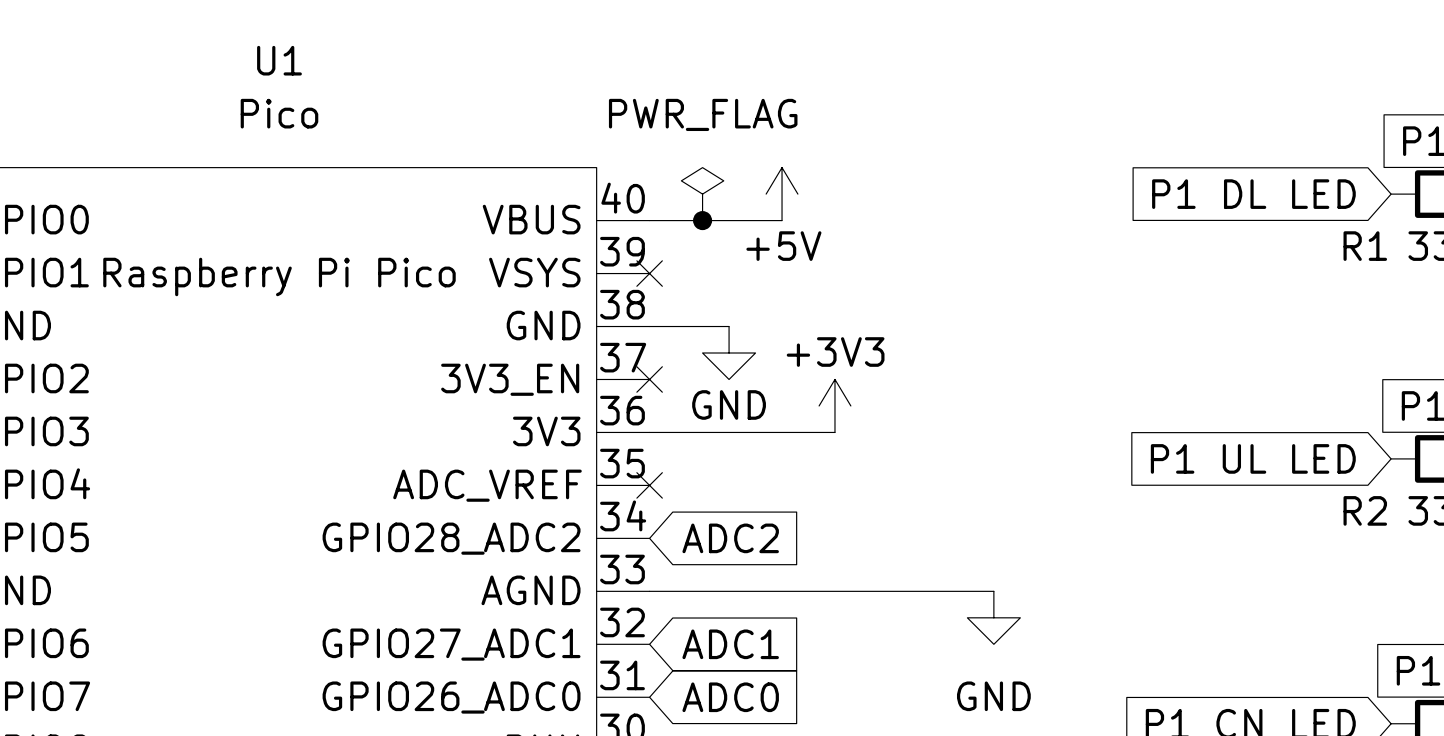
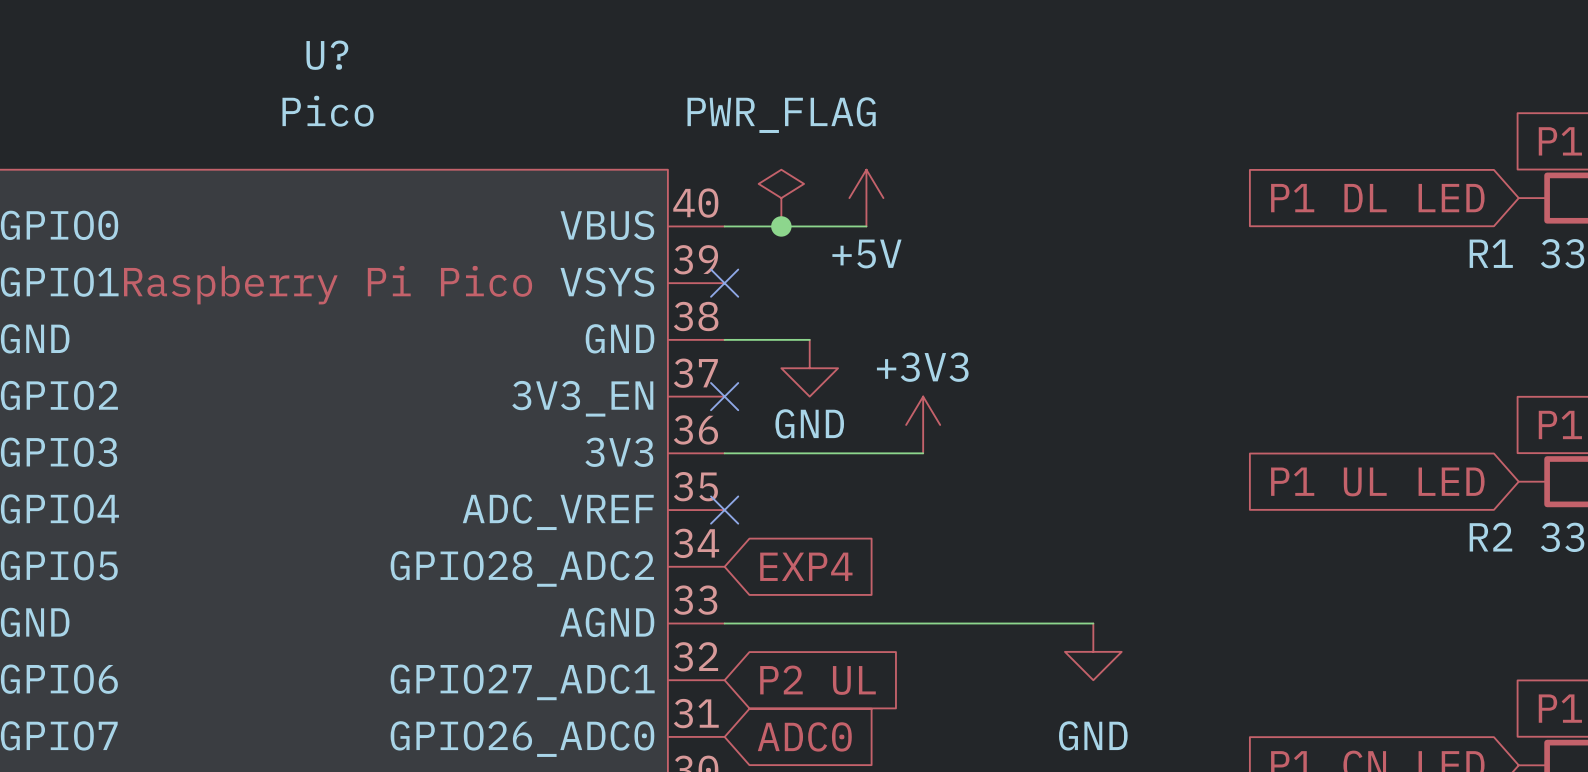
U1 name: U1 (279, 60) -> U? (327, 55)
global label: ADC2 (730, 538) -> EXP4 (806, 566)
global label: ADC1 (730, 644) -> P2 UL (818, 680)

